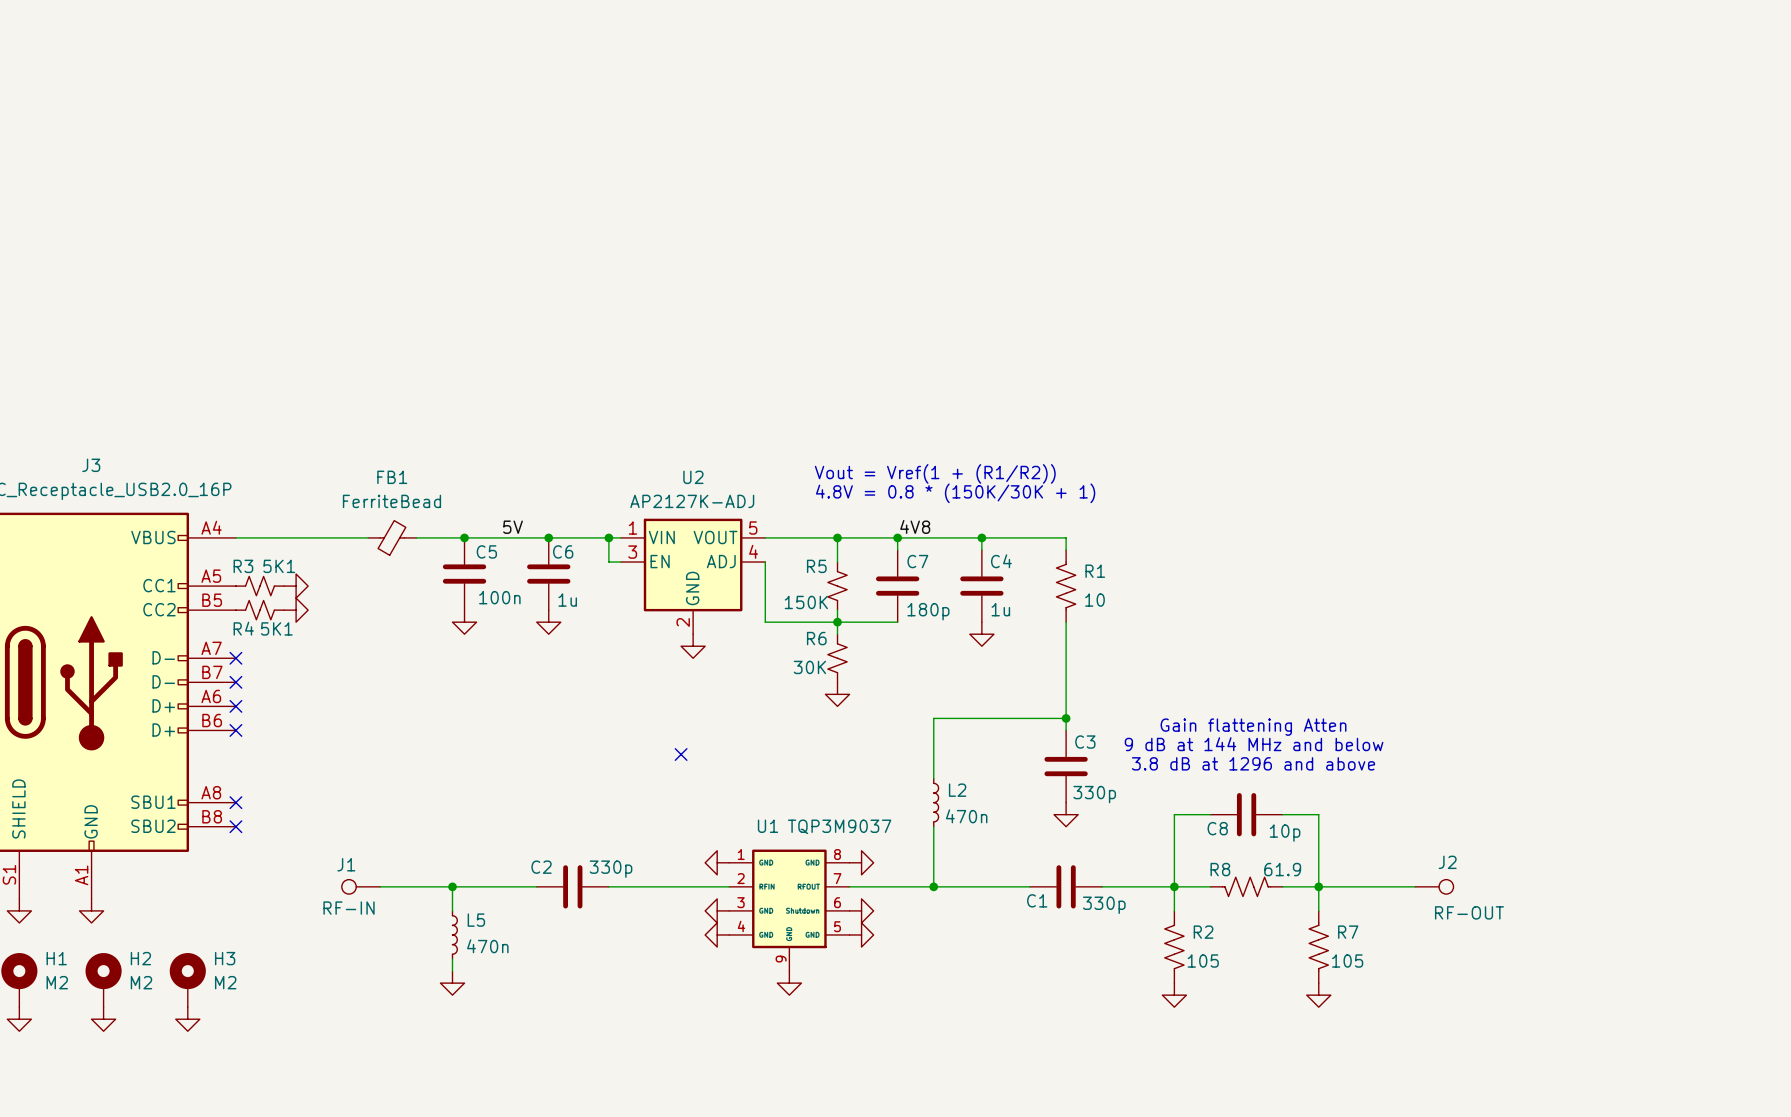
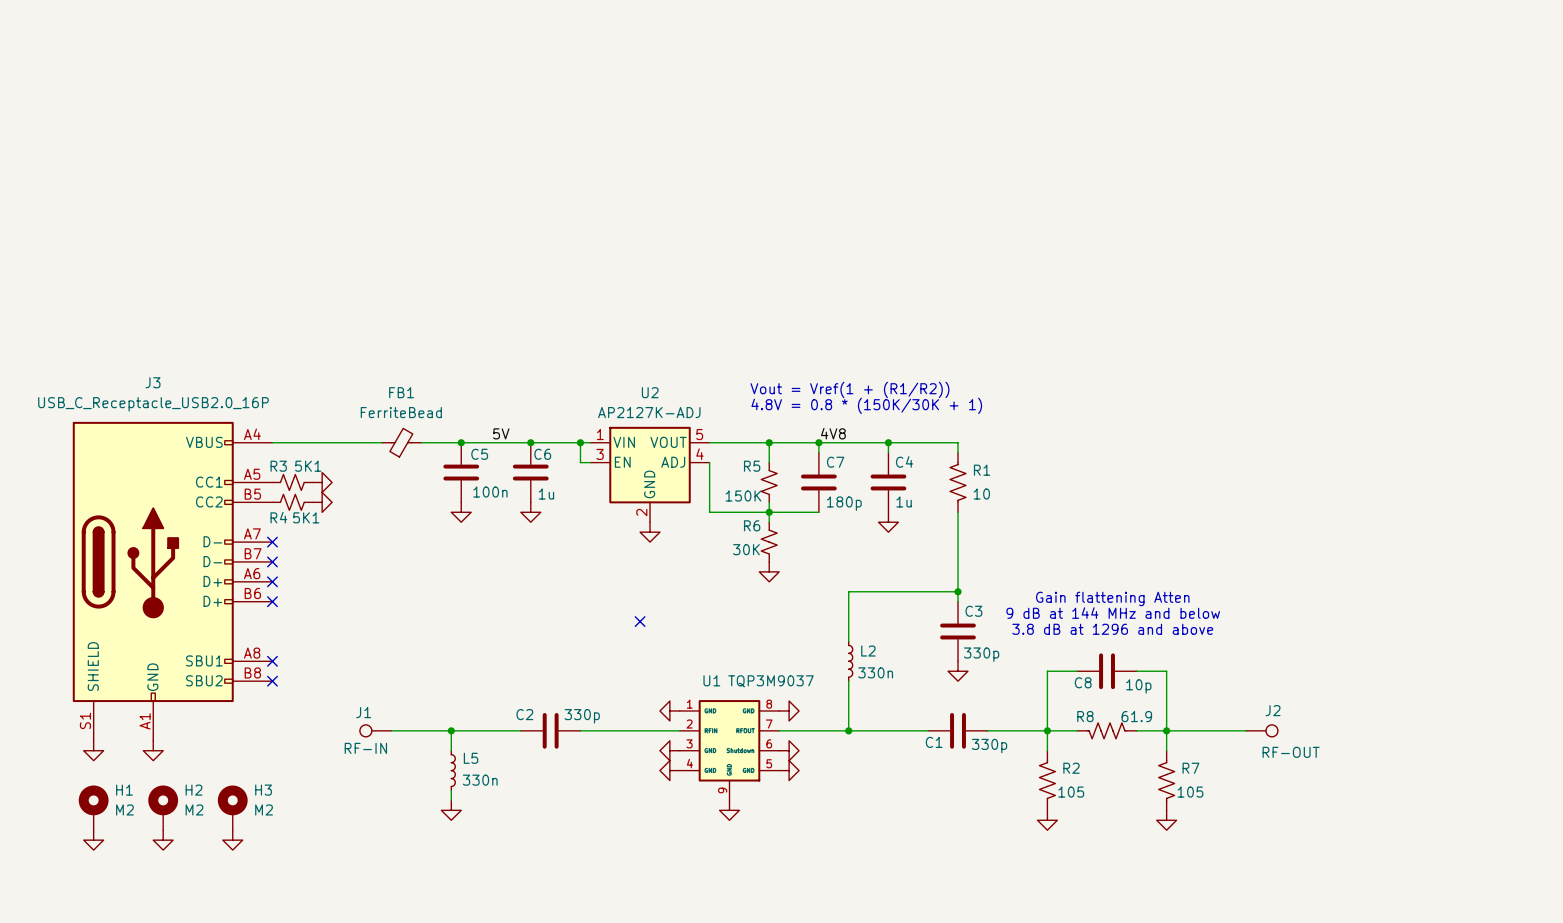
L2 value: 470n (966, 816) -> 330n (875, 672)
L5 value: 470n (487, 946) -> 330n (480, 780)

